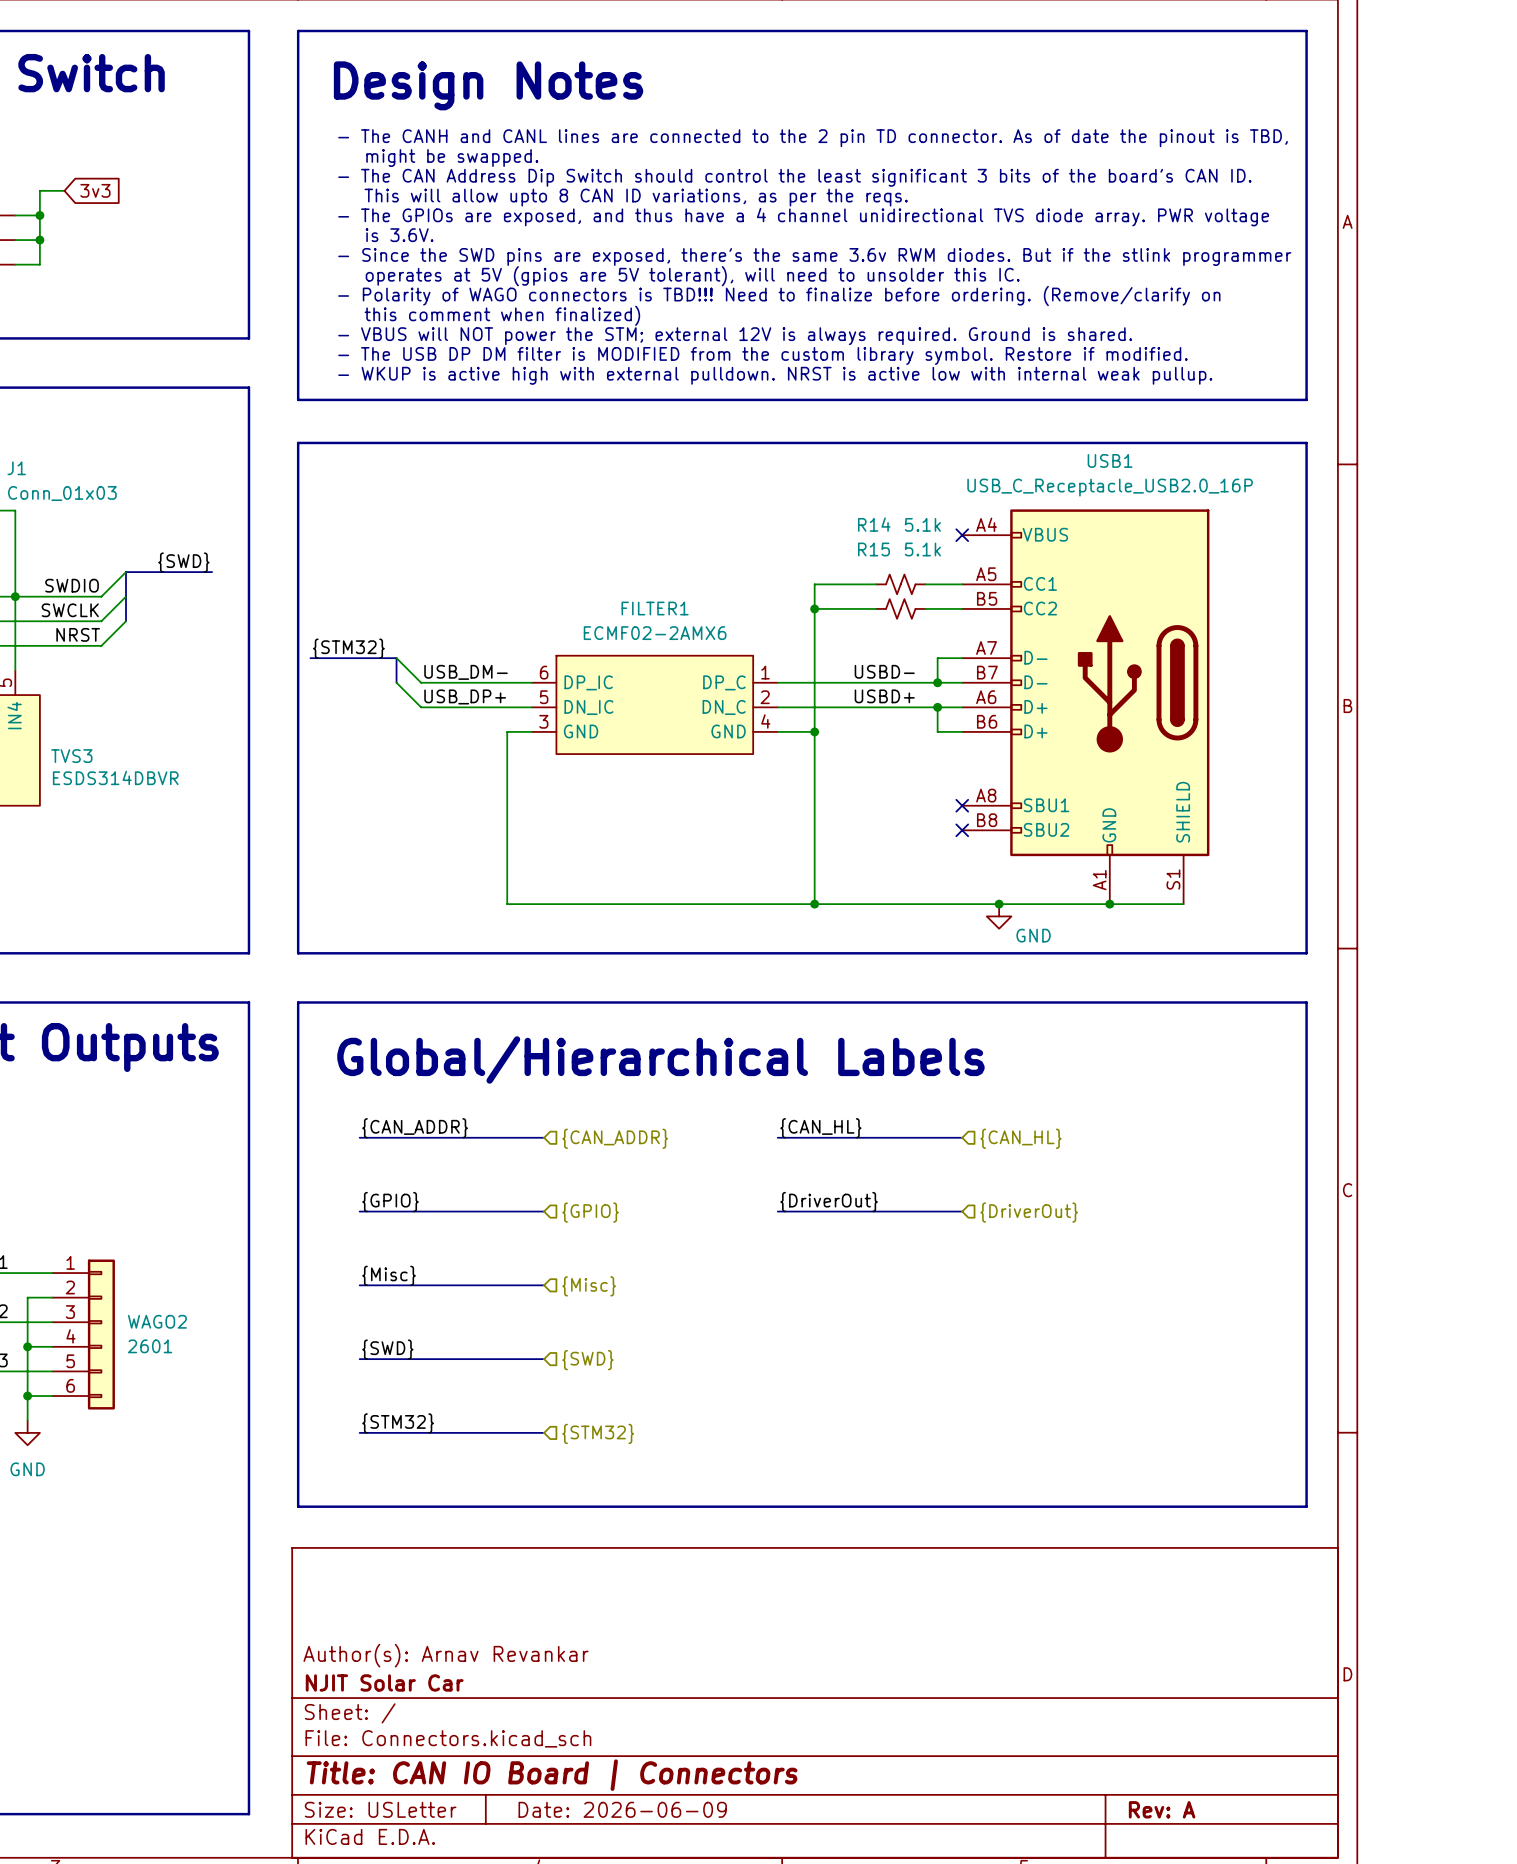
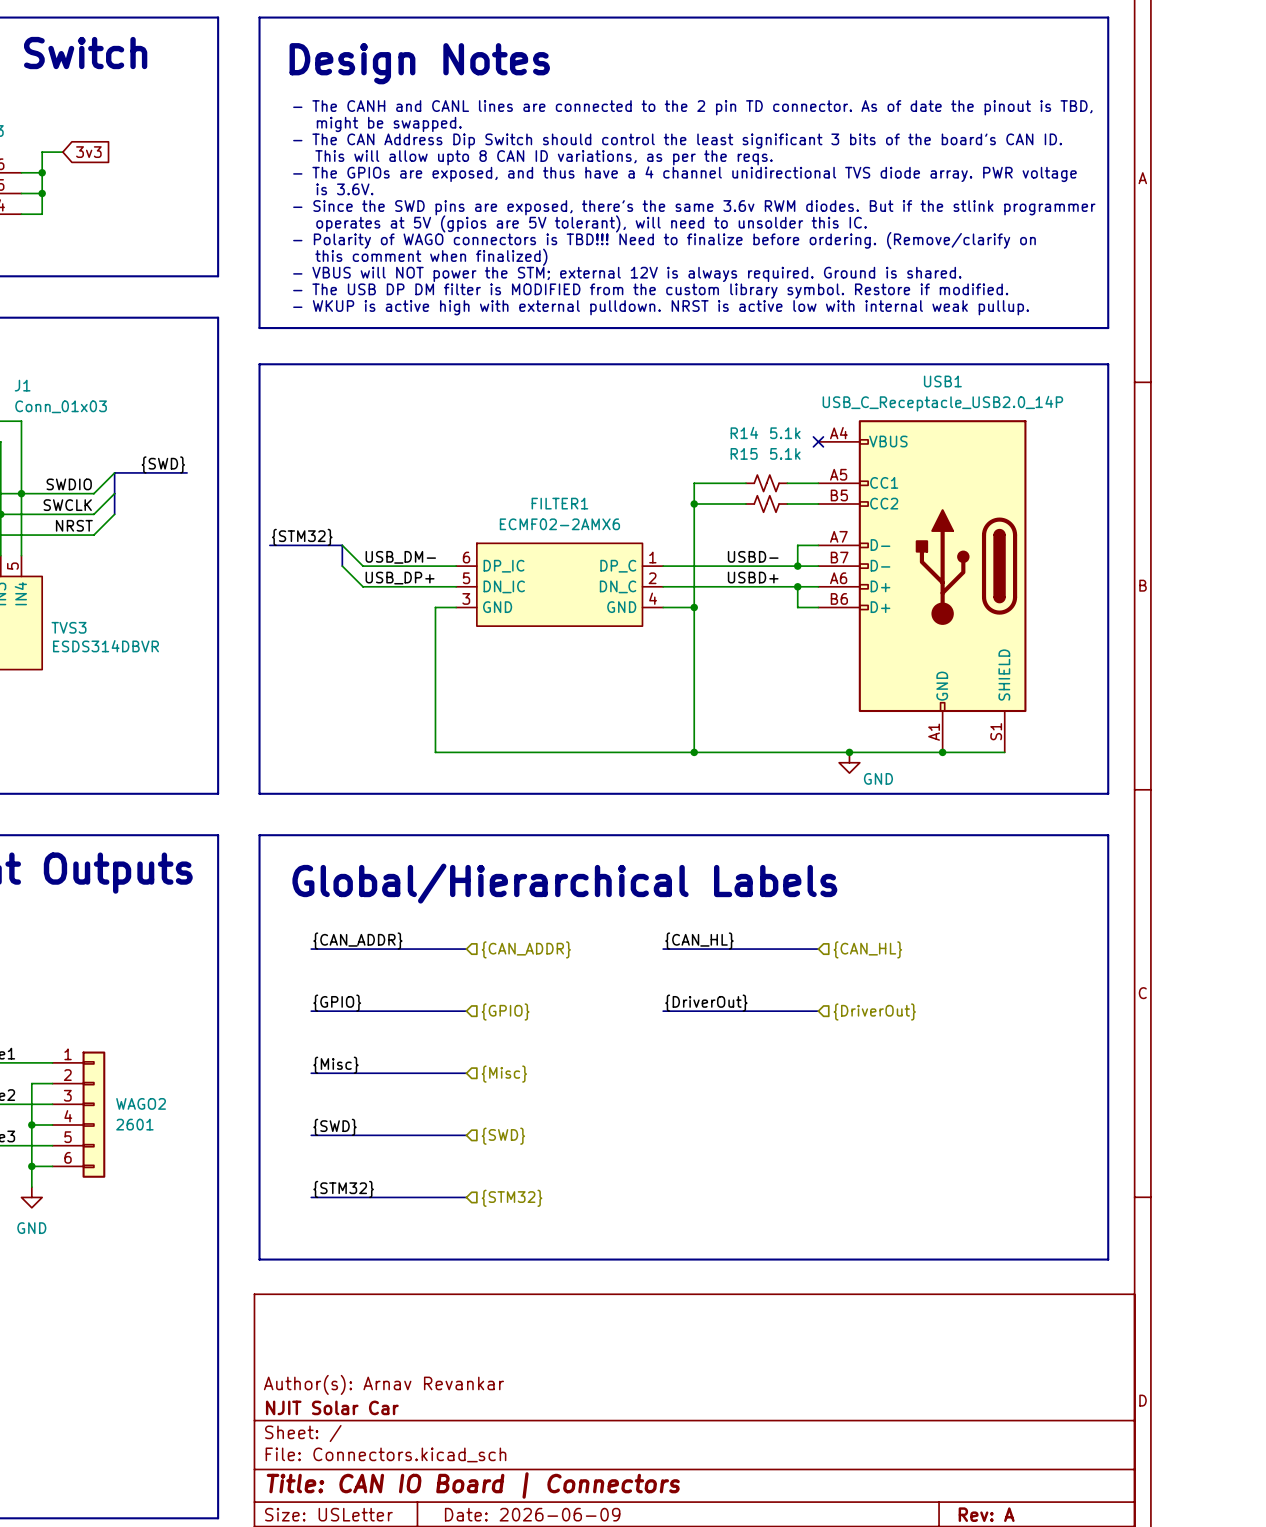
USB1 value: USB_C_Receptacle_USB2.0_16P (1110, 487) -> USB_C_Receptacle_USB2.0_14P (942, 403)
USB1 symbol: [962, 509, 1210, 905] -> [818, 420, 1027, 753]
no-connect mark: (962, 805) -> none
no-connect mark: (962, 830) -> none

